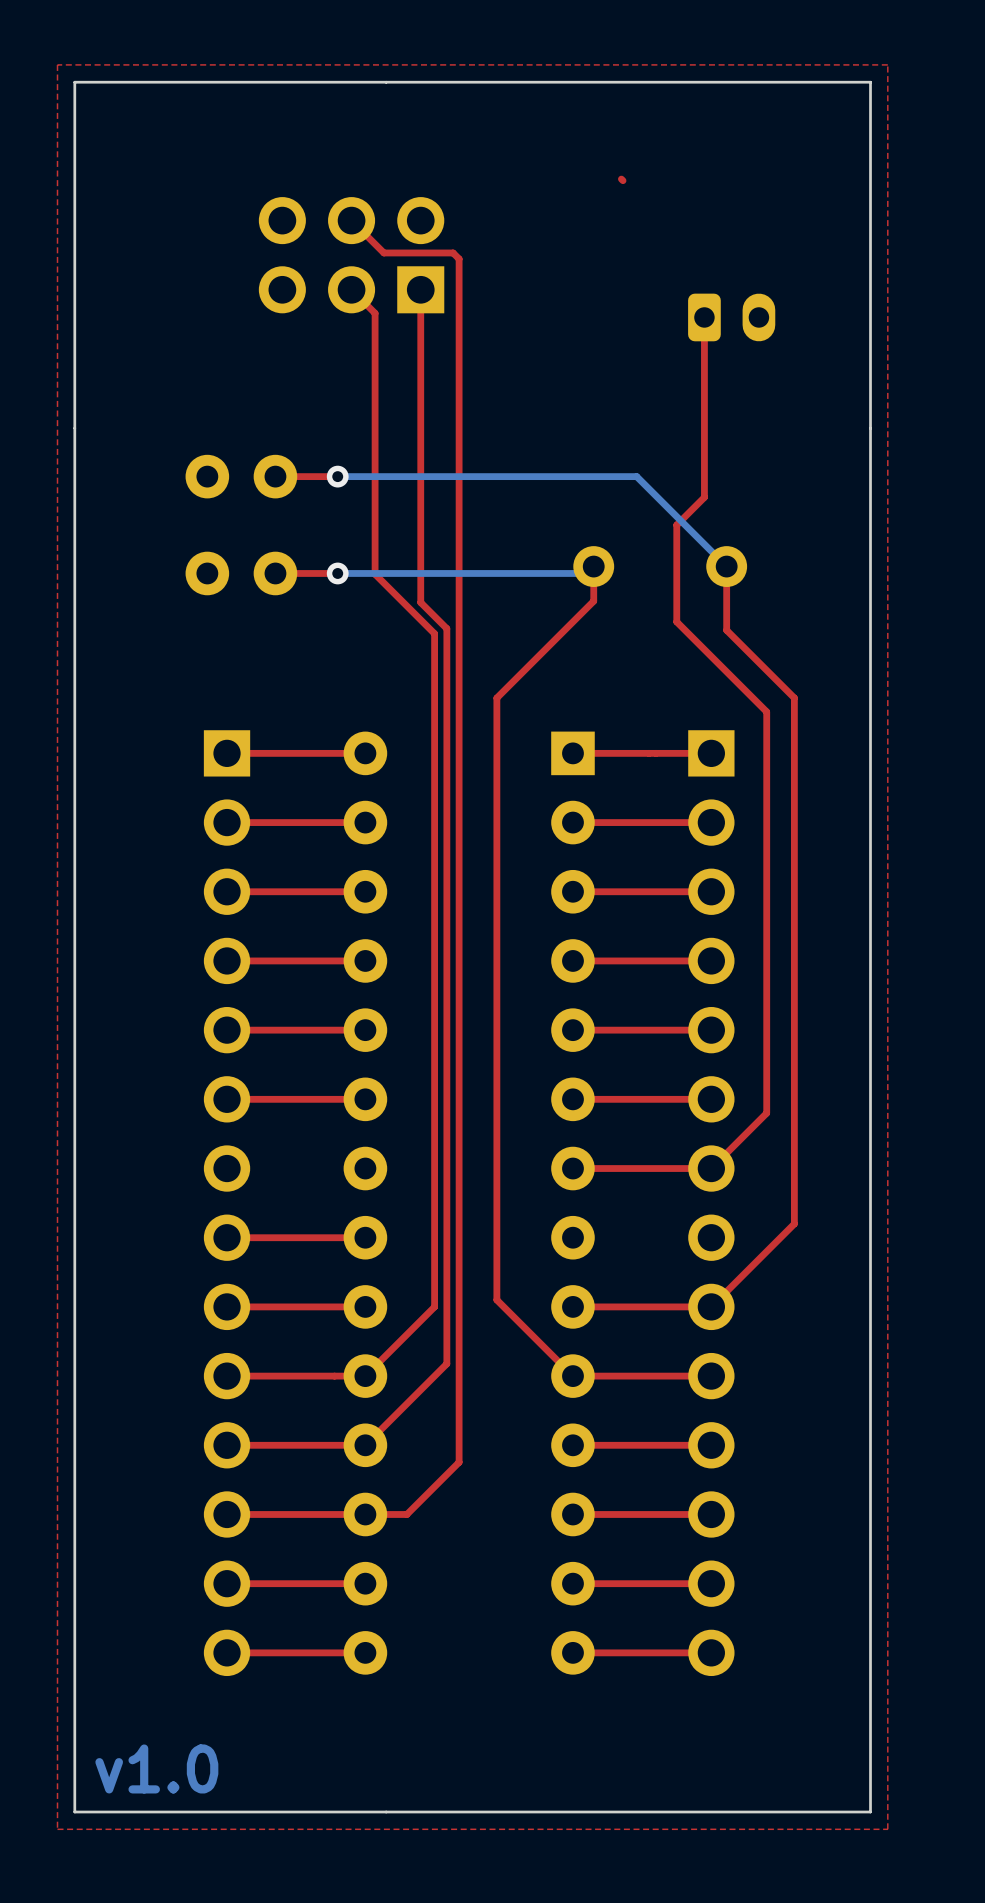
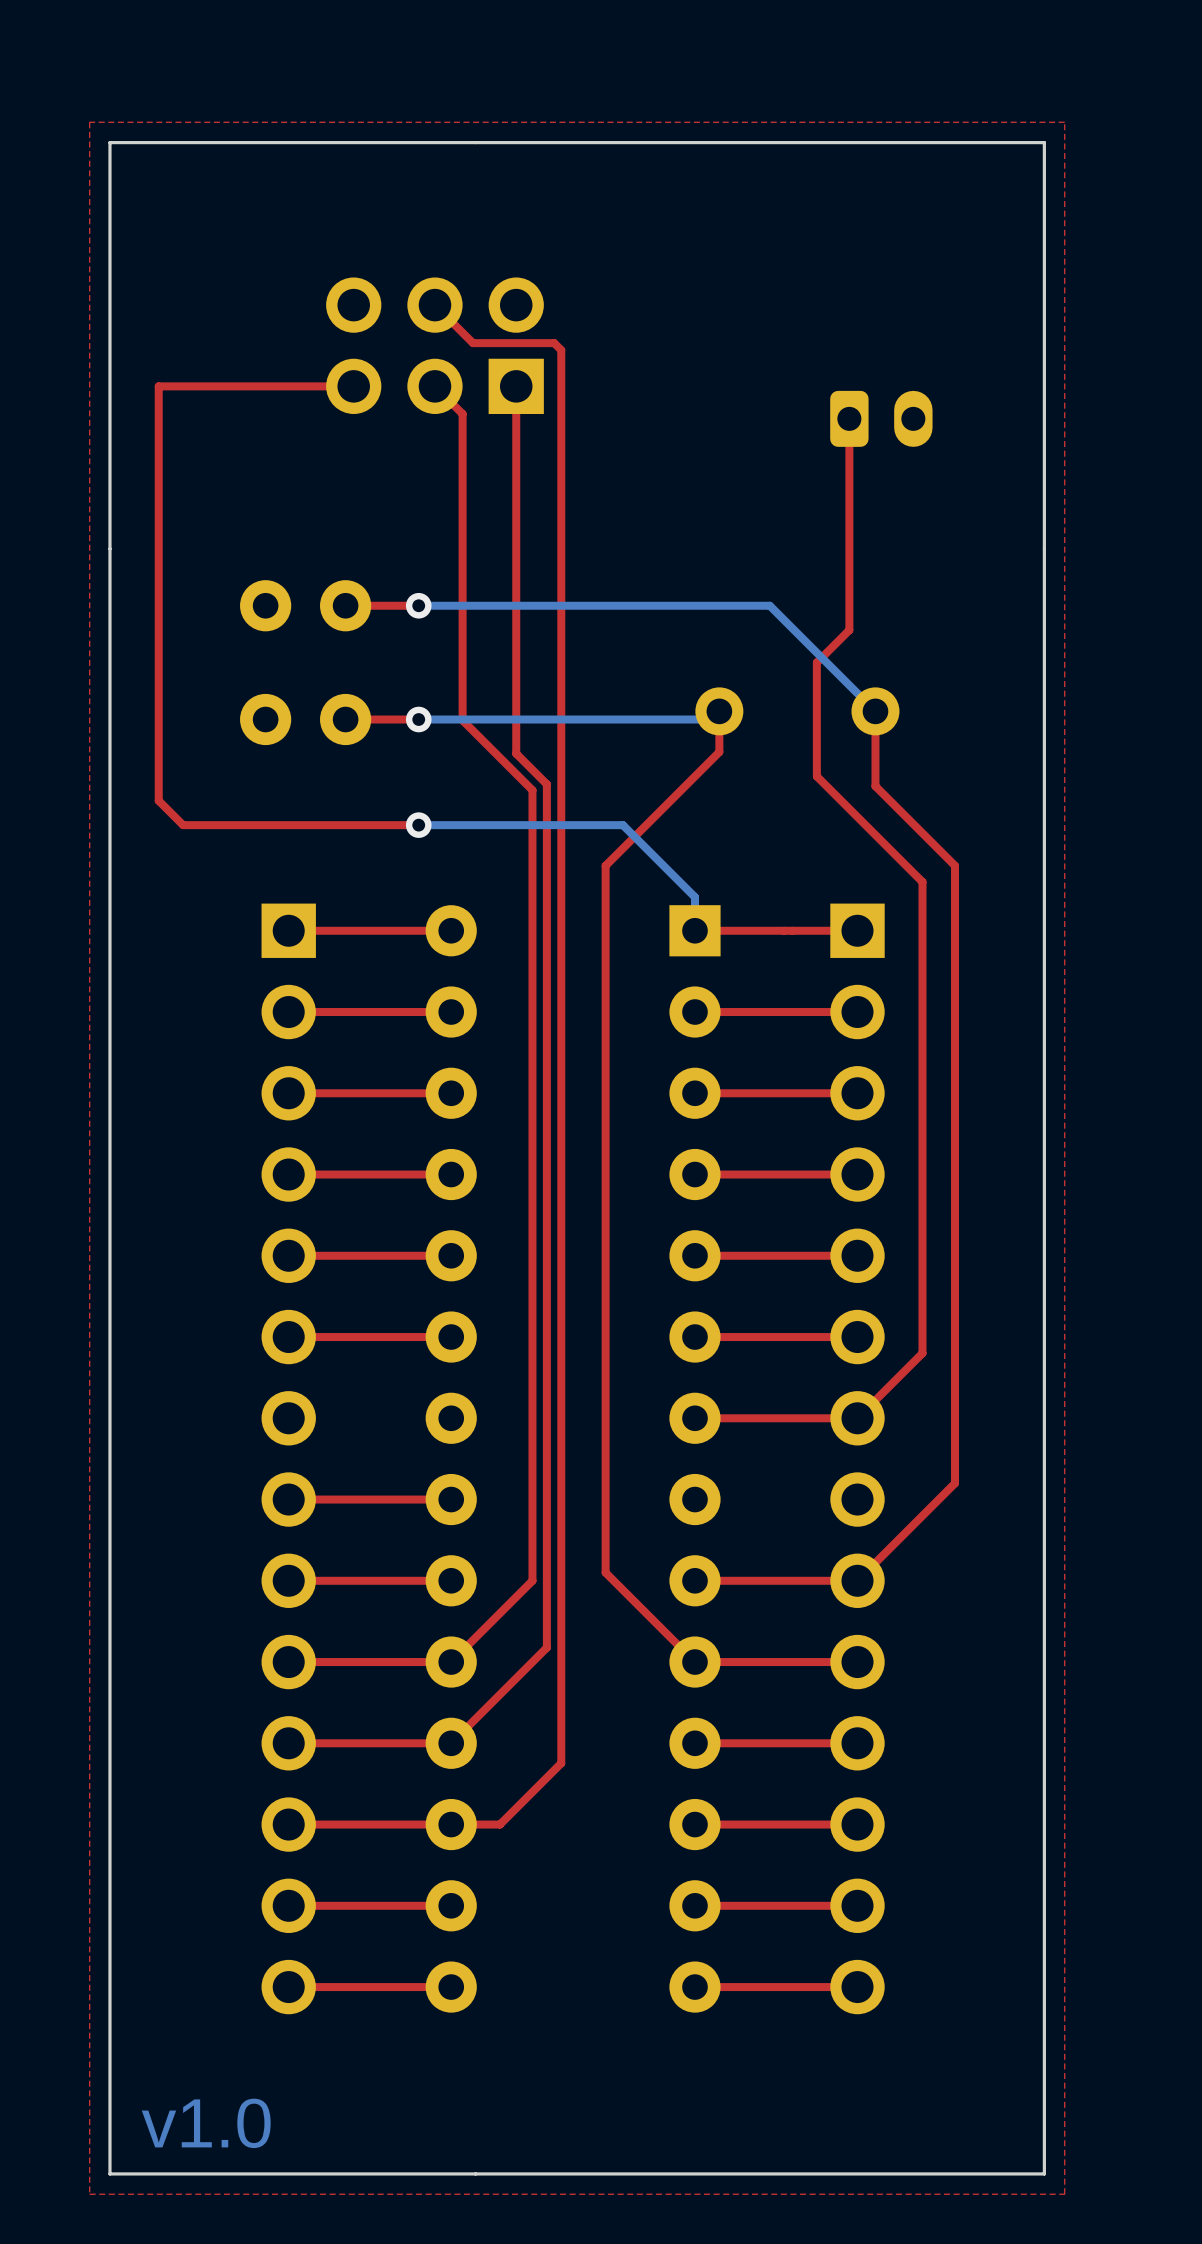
top track: (621, 179) (623, 180) -> none
top track: none -> (353, 386) (158, 386) (158, 800) (183, 825) (418, 825)
bottom track: none -> (418, 825) (622, 825) (694, 897) (694, 930)
via: none -> (418, 825)

